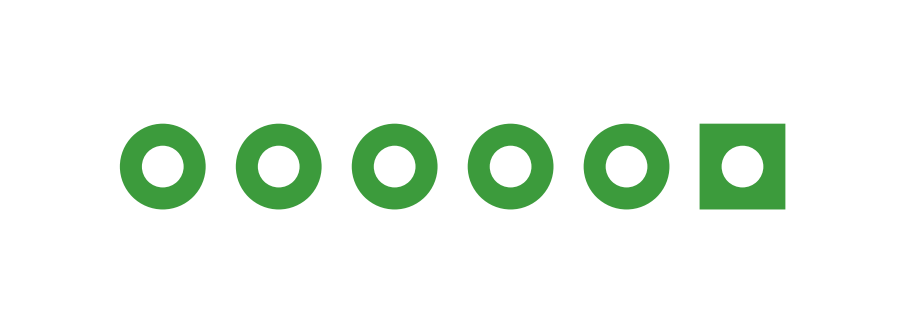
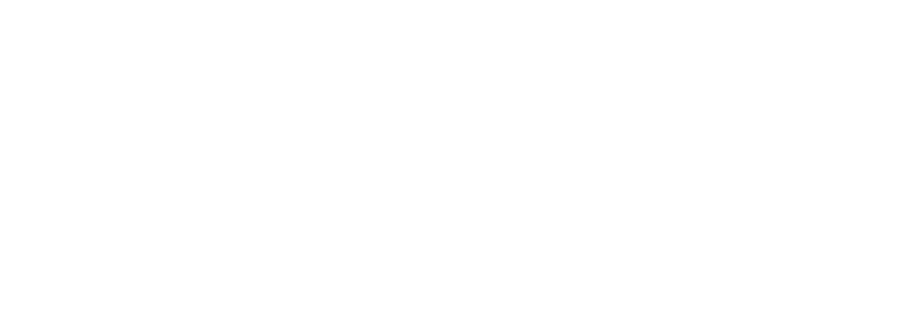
part: (452, 166) -> none

